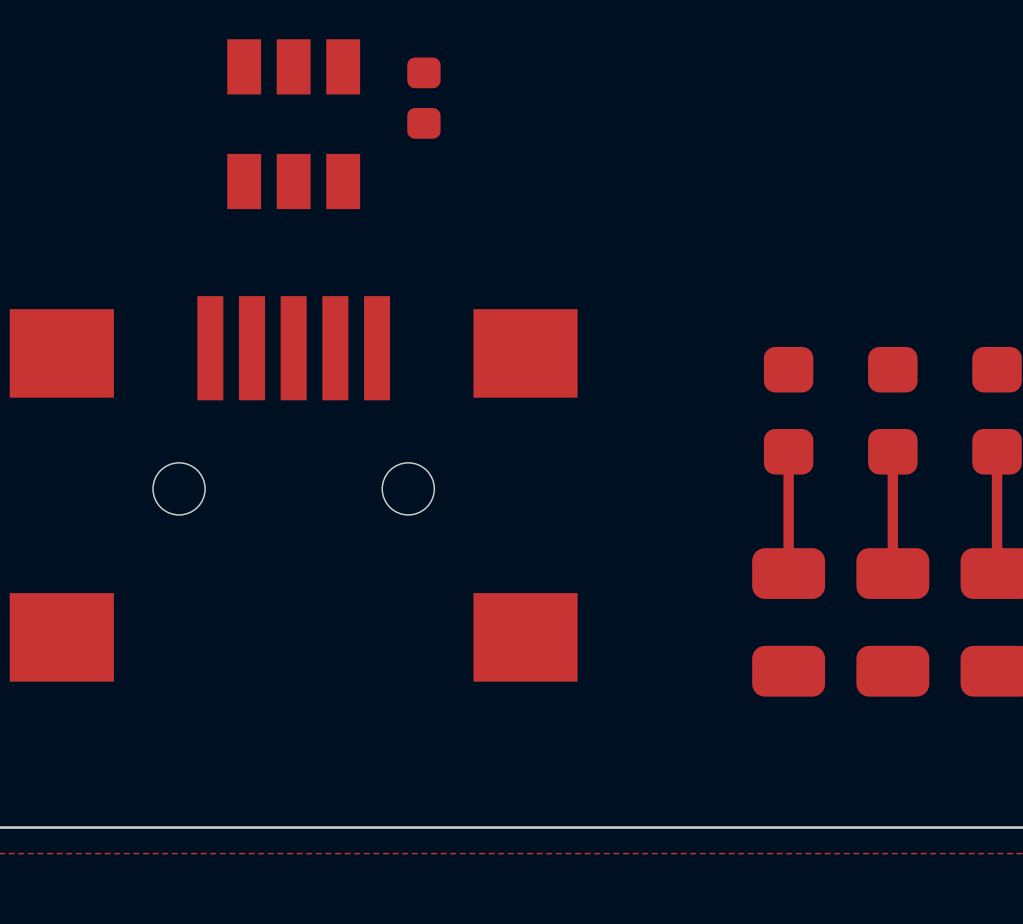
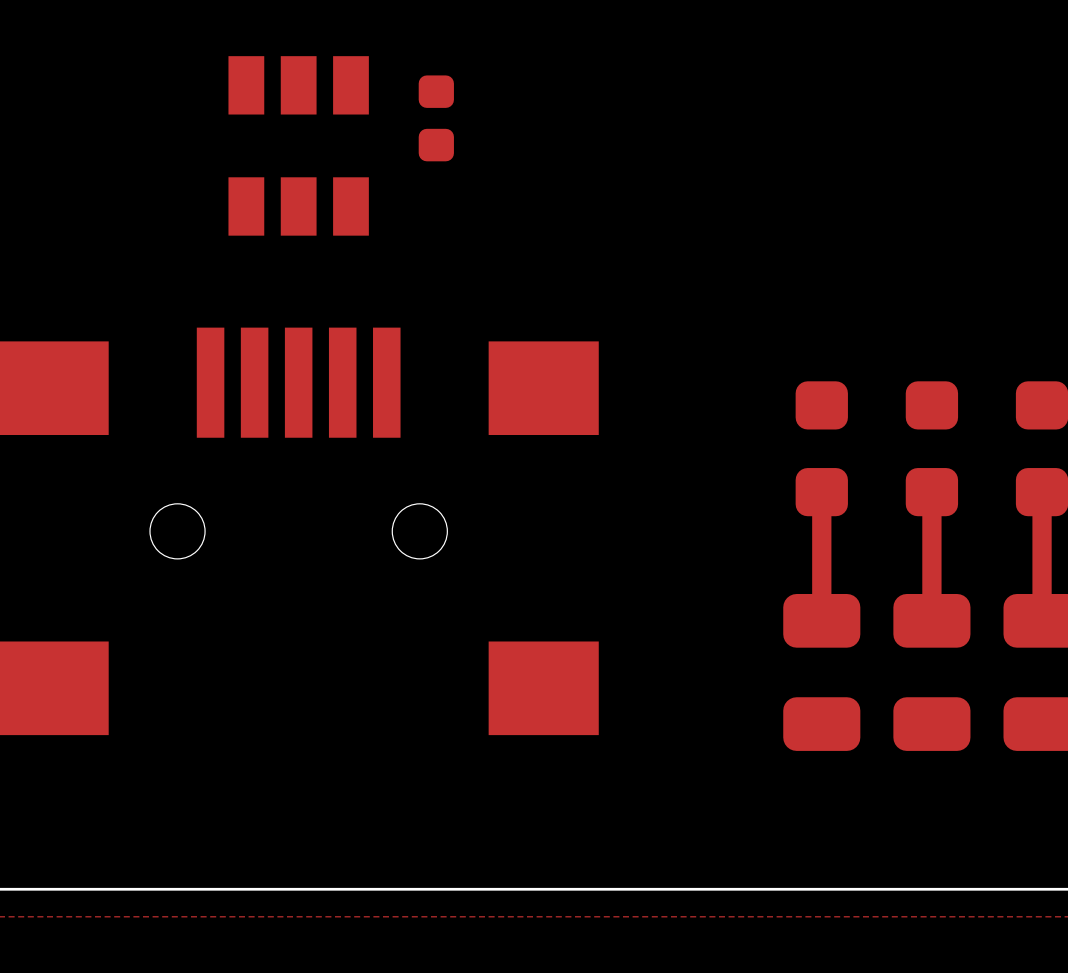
top track width: thin (788, 451) (788, 573) -> thick (821, 492) (821, 620)
top track width: thin (892, 451) (892, 573) -> thick (931, 492) (931, 620)
top track width: thin (997, 451) (997, 573) -> thick (1042, 492) (1042, 620)

